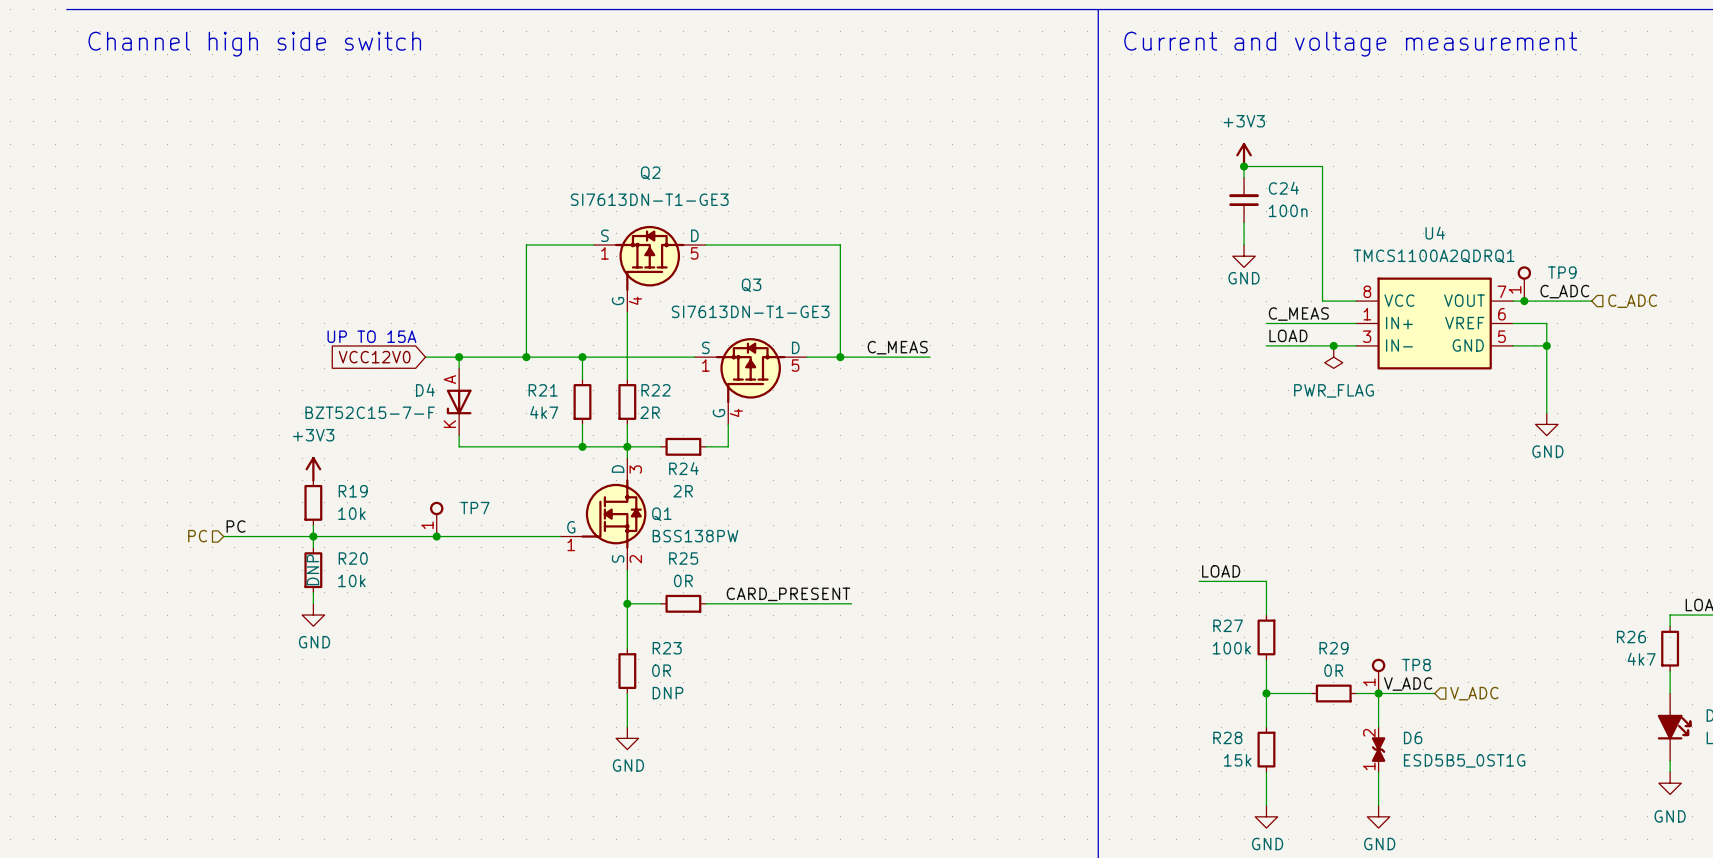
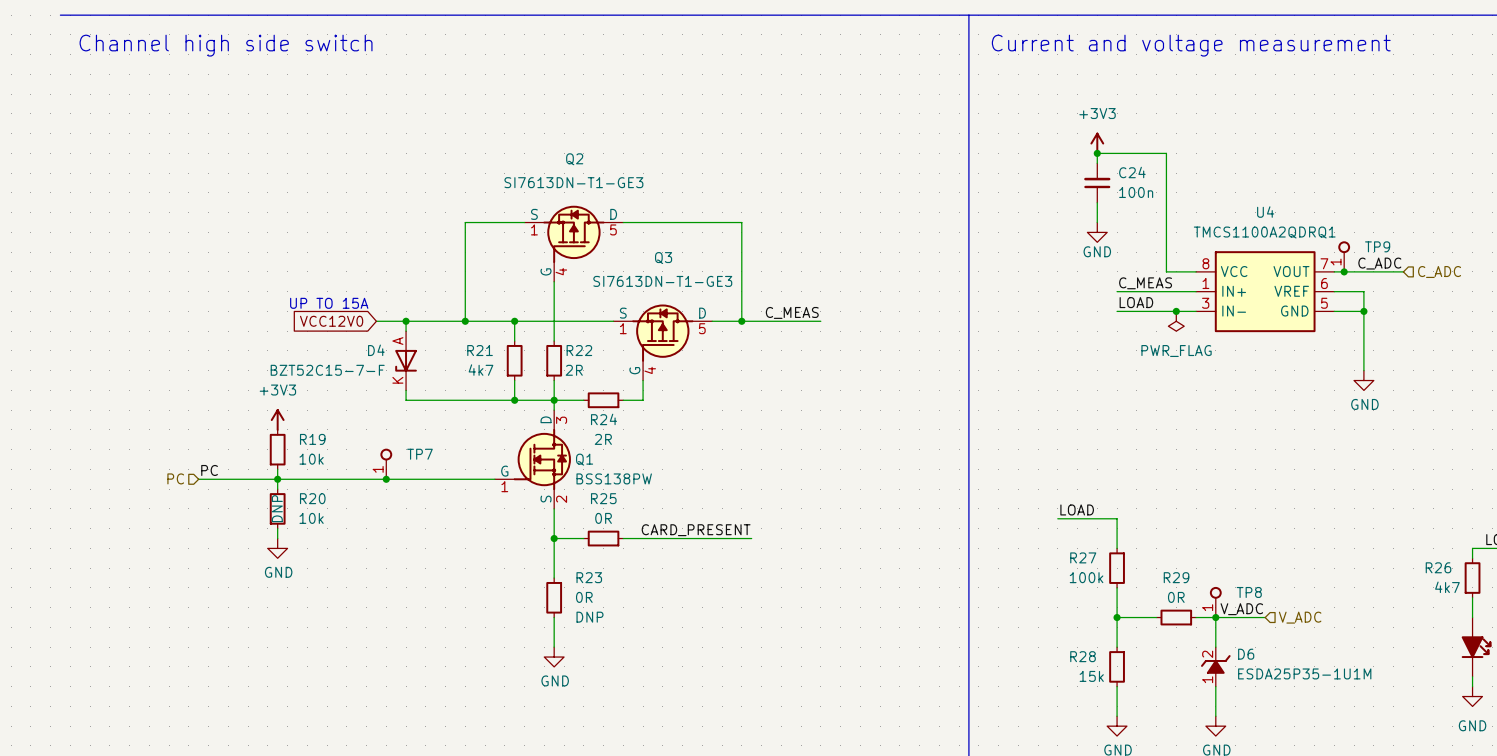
D6 symbol: [1371, 727, 1386, 772] -> [1200, 647, 1231, 687]
D6 value: ESD5B5_0ST1G (1464, 760) -> ESDA25P35-1U1M (1304, 673)

